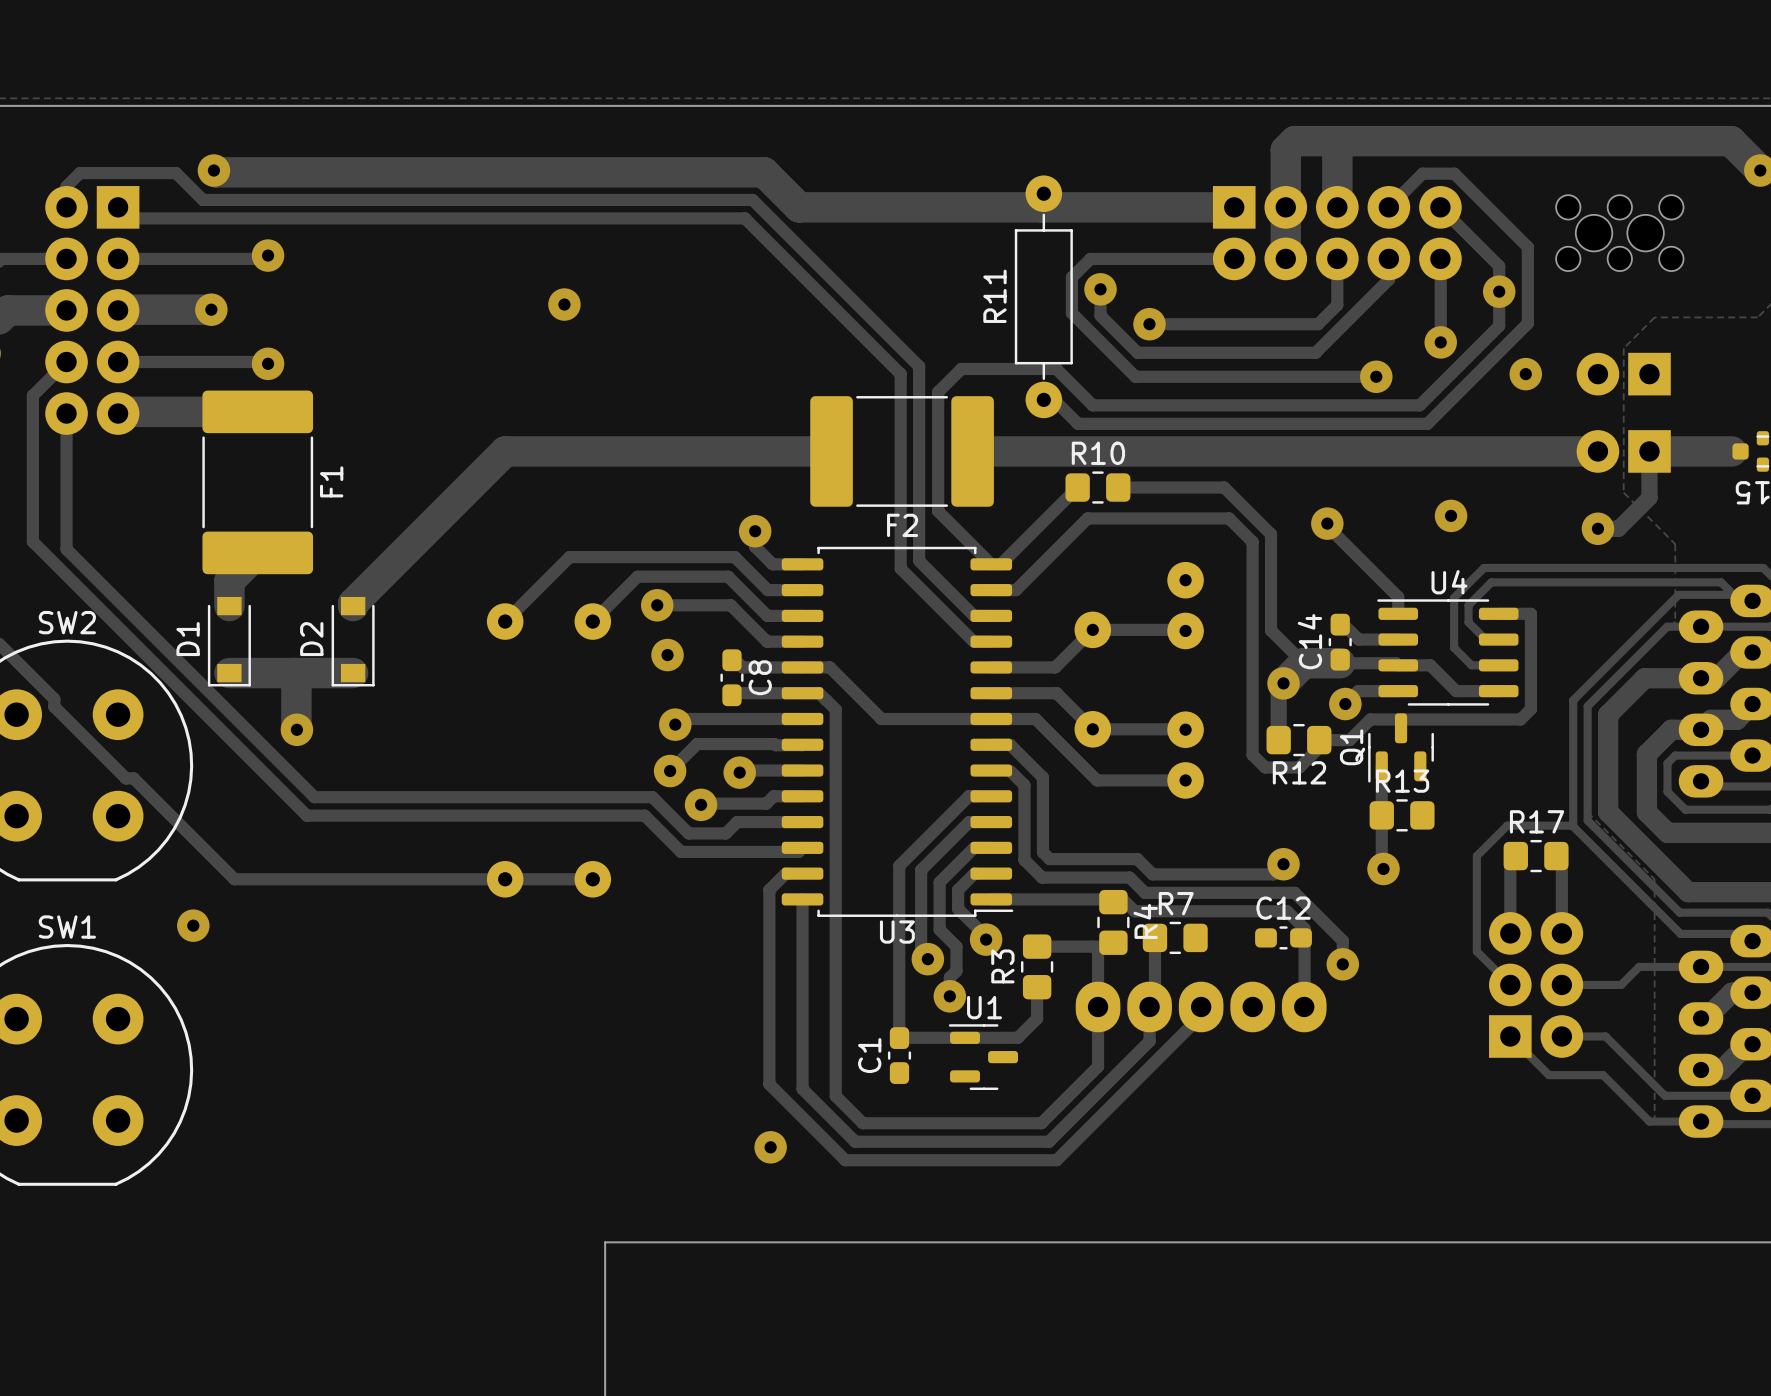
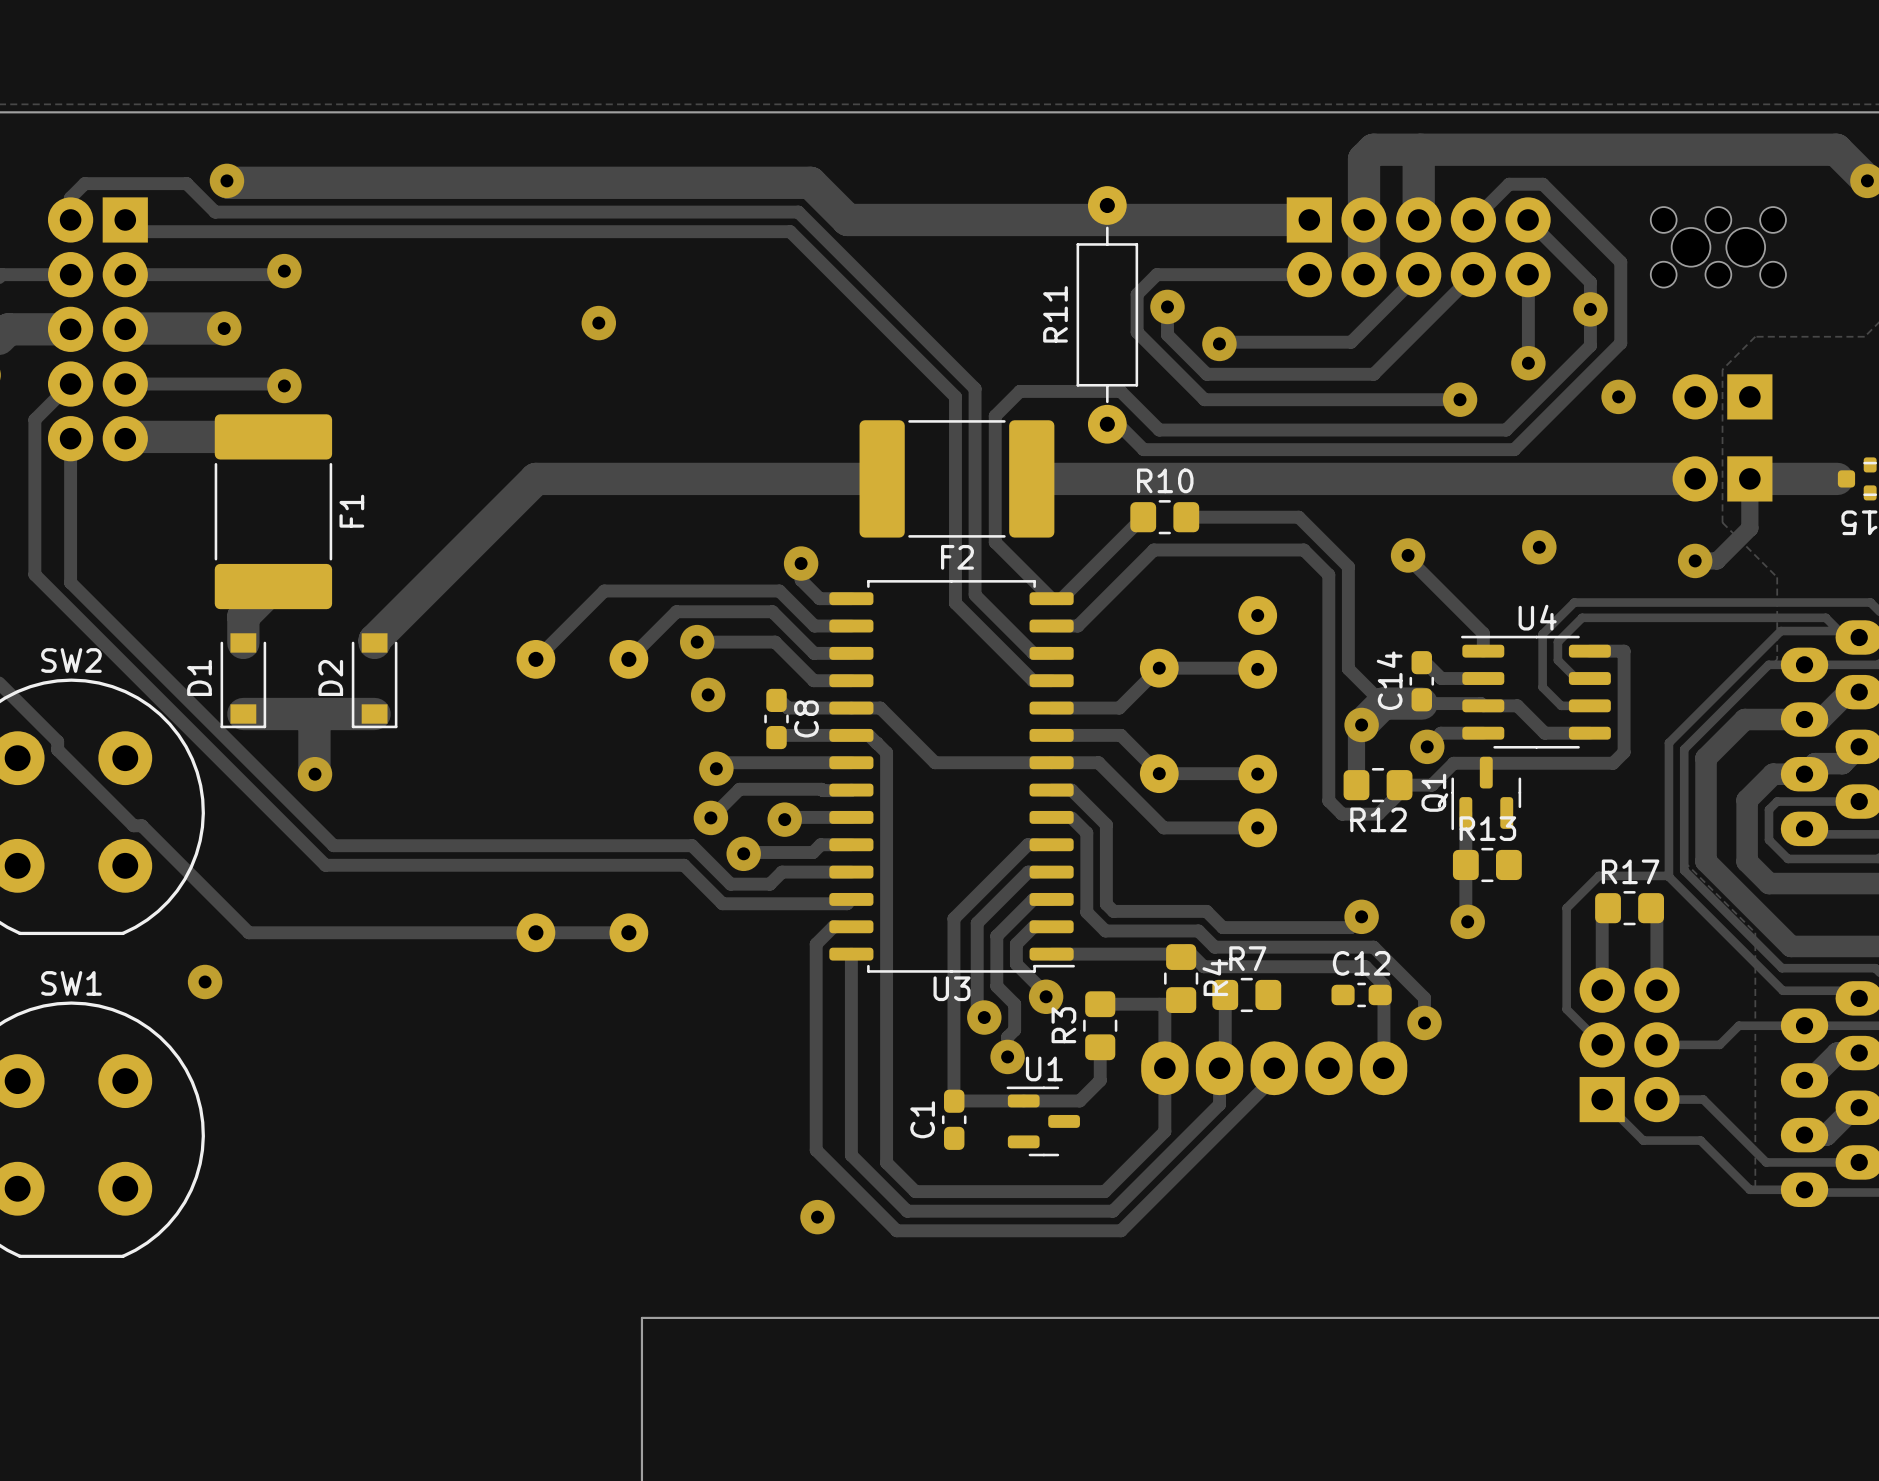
track: (1337, 258) (1337, 305) (1318, 324) (1149, 324) -> (1418, 274) (1351, 342) (1221, 342) (1219, 343)
track: (1388, 258) (1388, 279) (1315, 352) (1294, 352) -> (1473, 274) (1373, 374)

